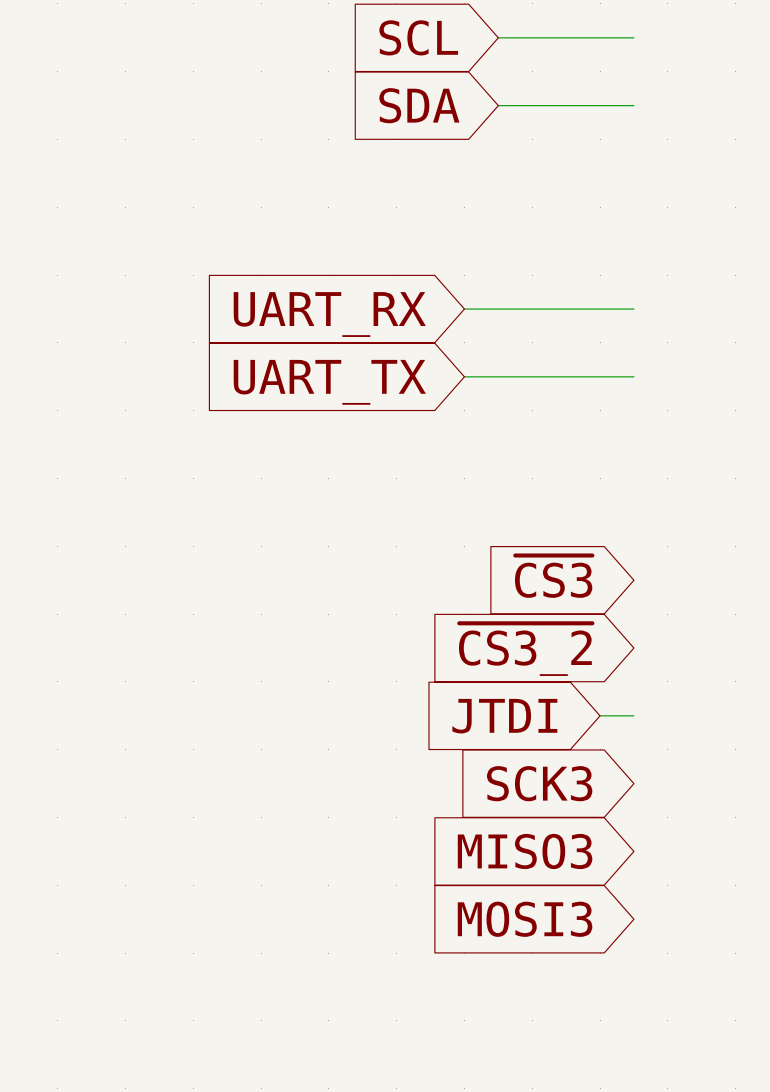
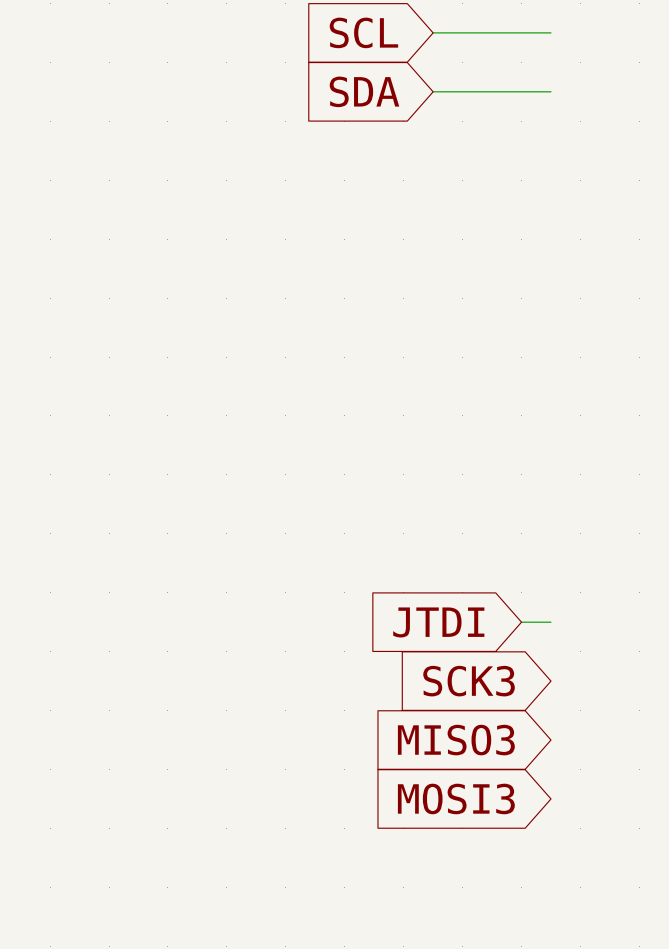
wire: (464, 309) (633, 309) -> none
global label: UART_RX (329, 314) -> none
wire: (464, 376) (633, 376) -> none
global label: UART_TX (329, 382) -> none
global label: ~{CS3} (553, 576) -> none
global label: ~{CS3_2} (525, 649) -> none

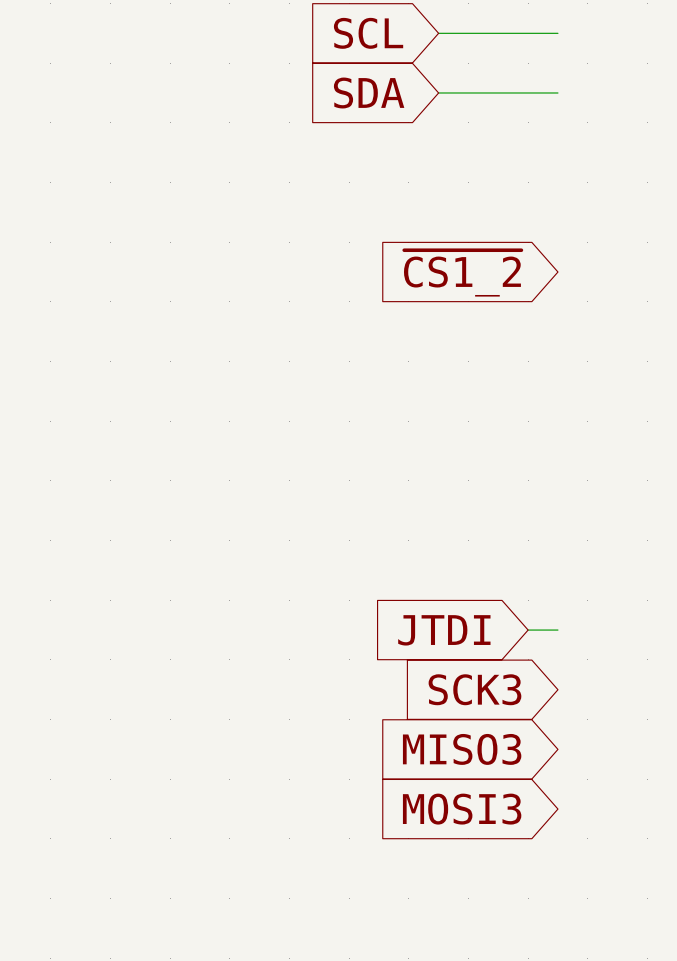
global label: none -> ~{CS1_2} (462, 273)

